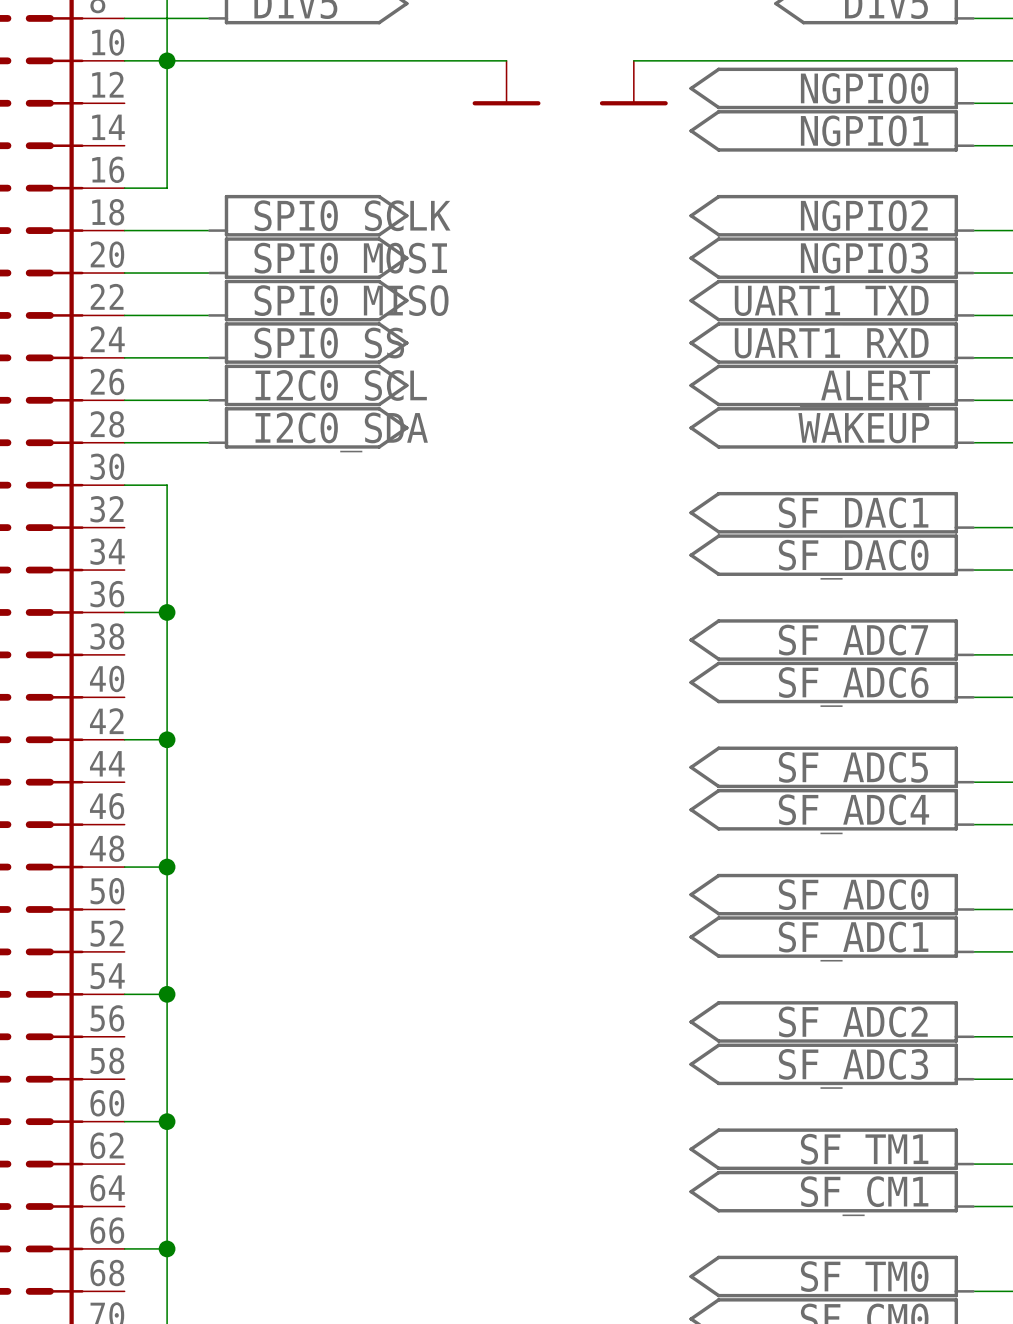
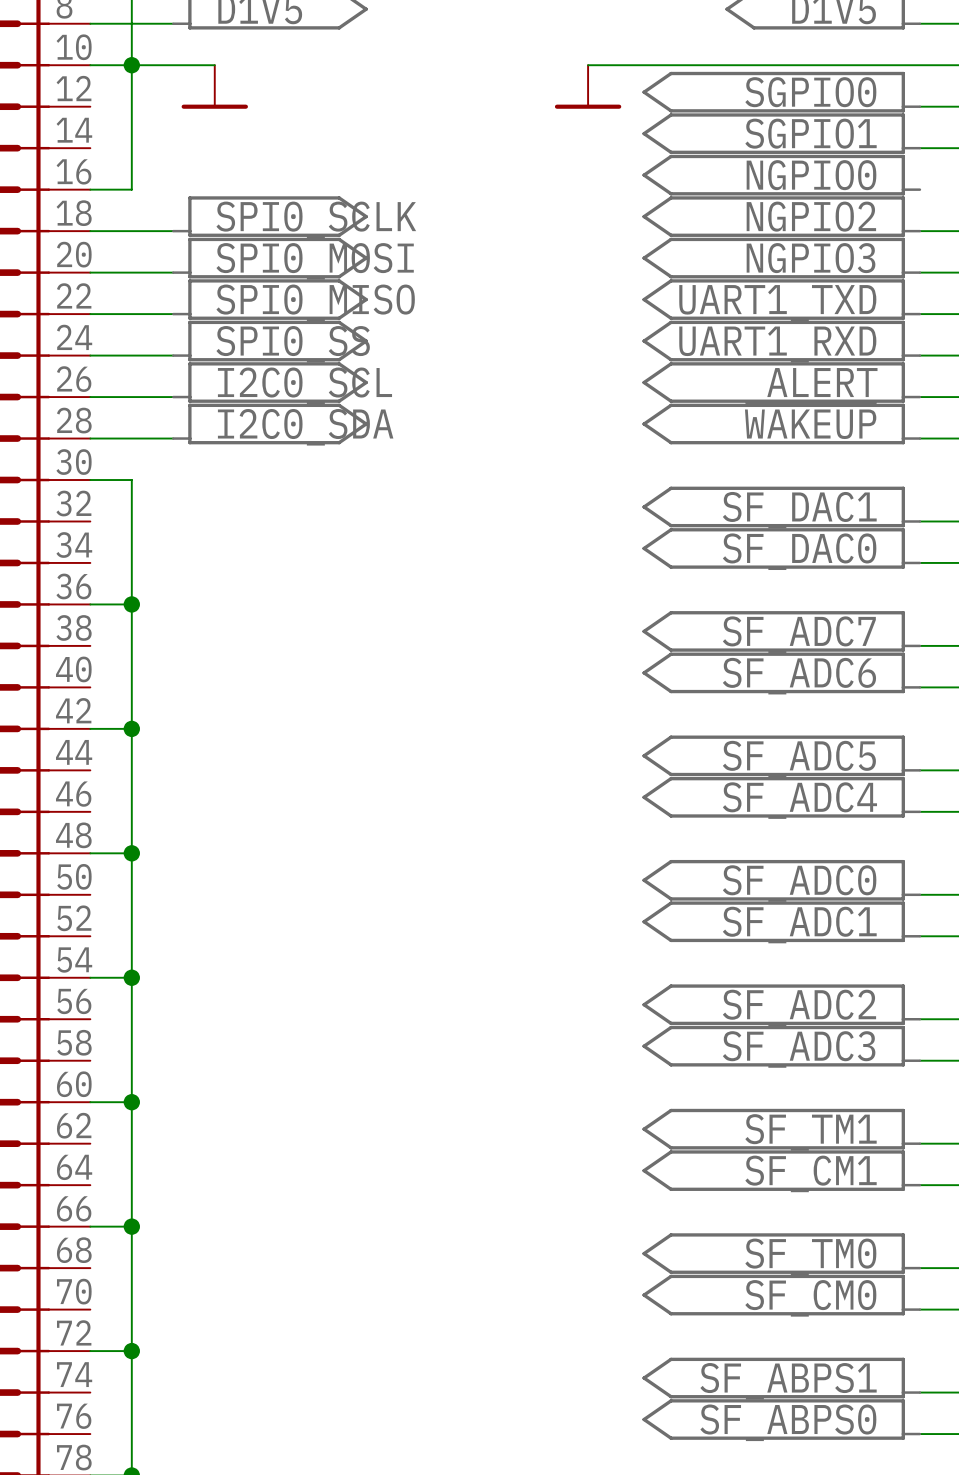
wire: (251, 60) (506, 60) -> none
power symbol position: (506, 83) -> (214, 86)
label: NGPIO0 (864, 88) -> SGPIO0 (810, 92)
label: NGPIO1 (864, 130) -> SGPIO1 (811, 133)
part: none -> (781, 175)
label: none -> NGPIO0 (811, 175)

